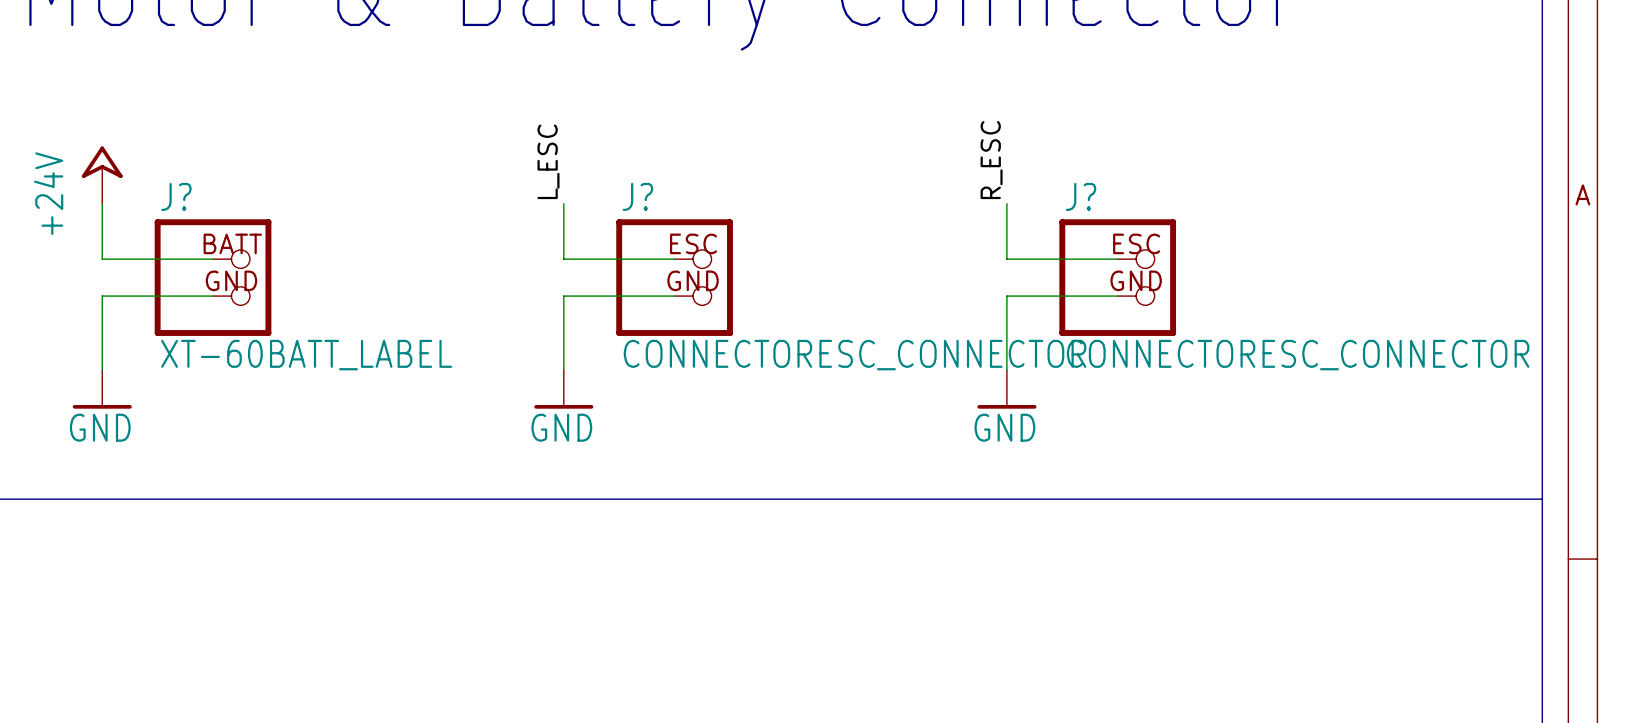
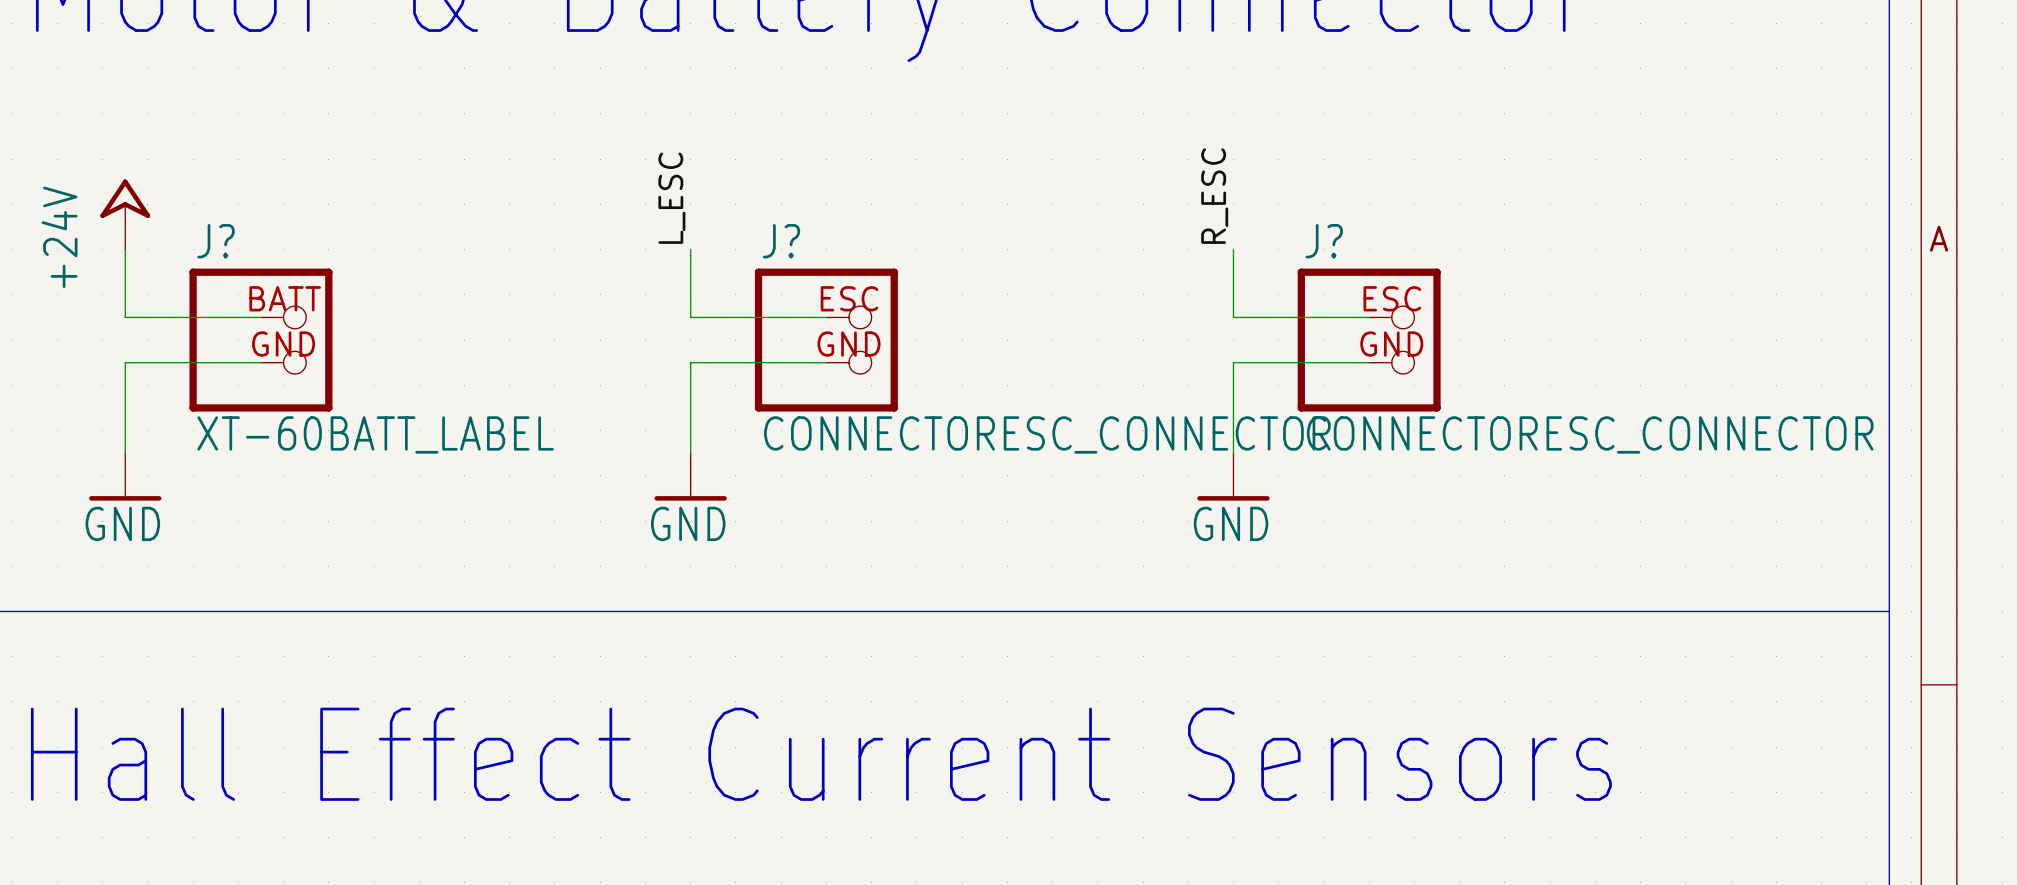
text: none -> Hall Effect Current Sensors (821, 754)

